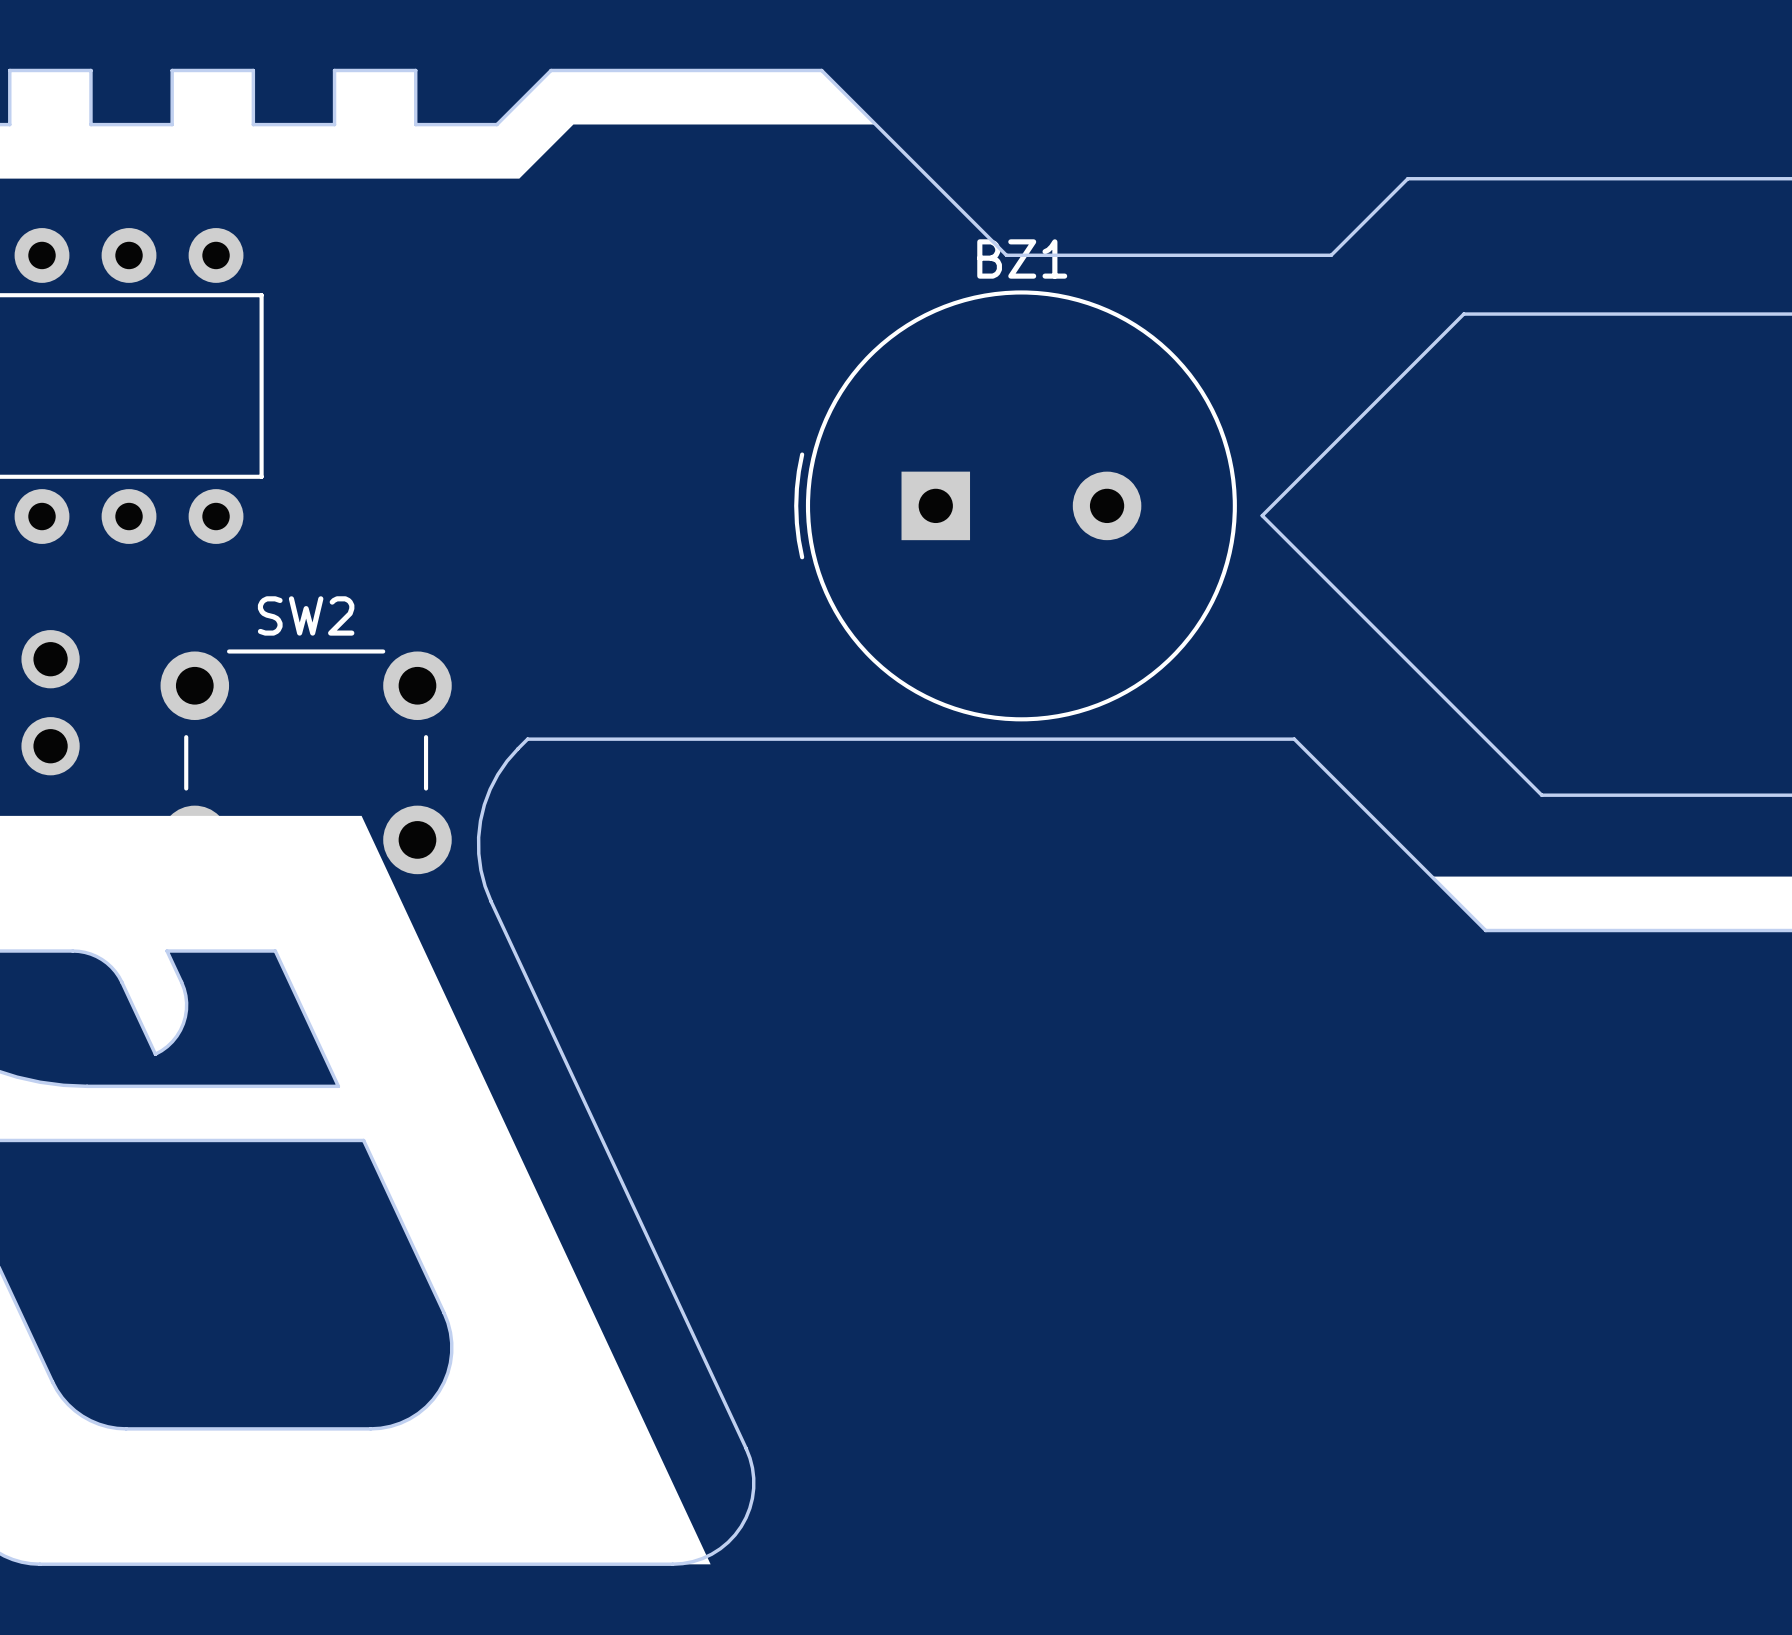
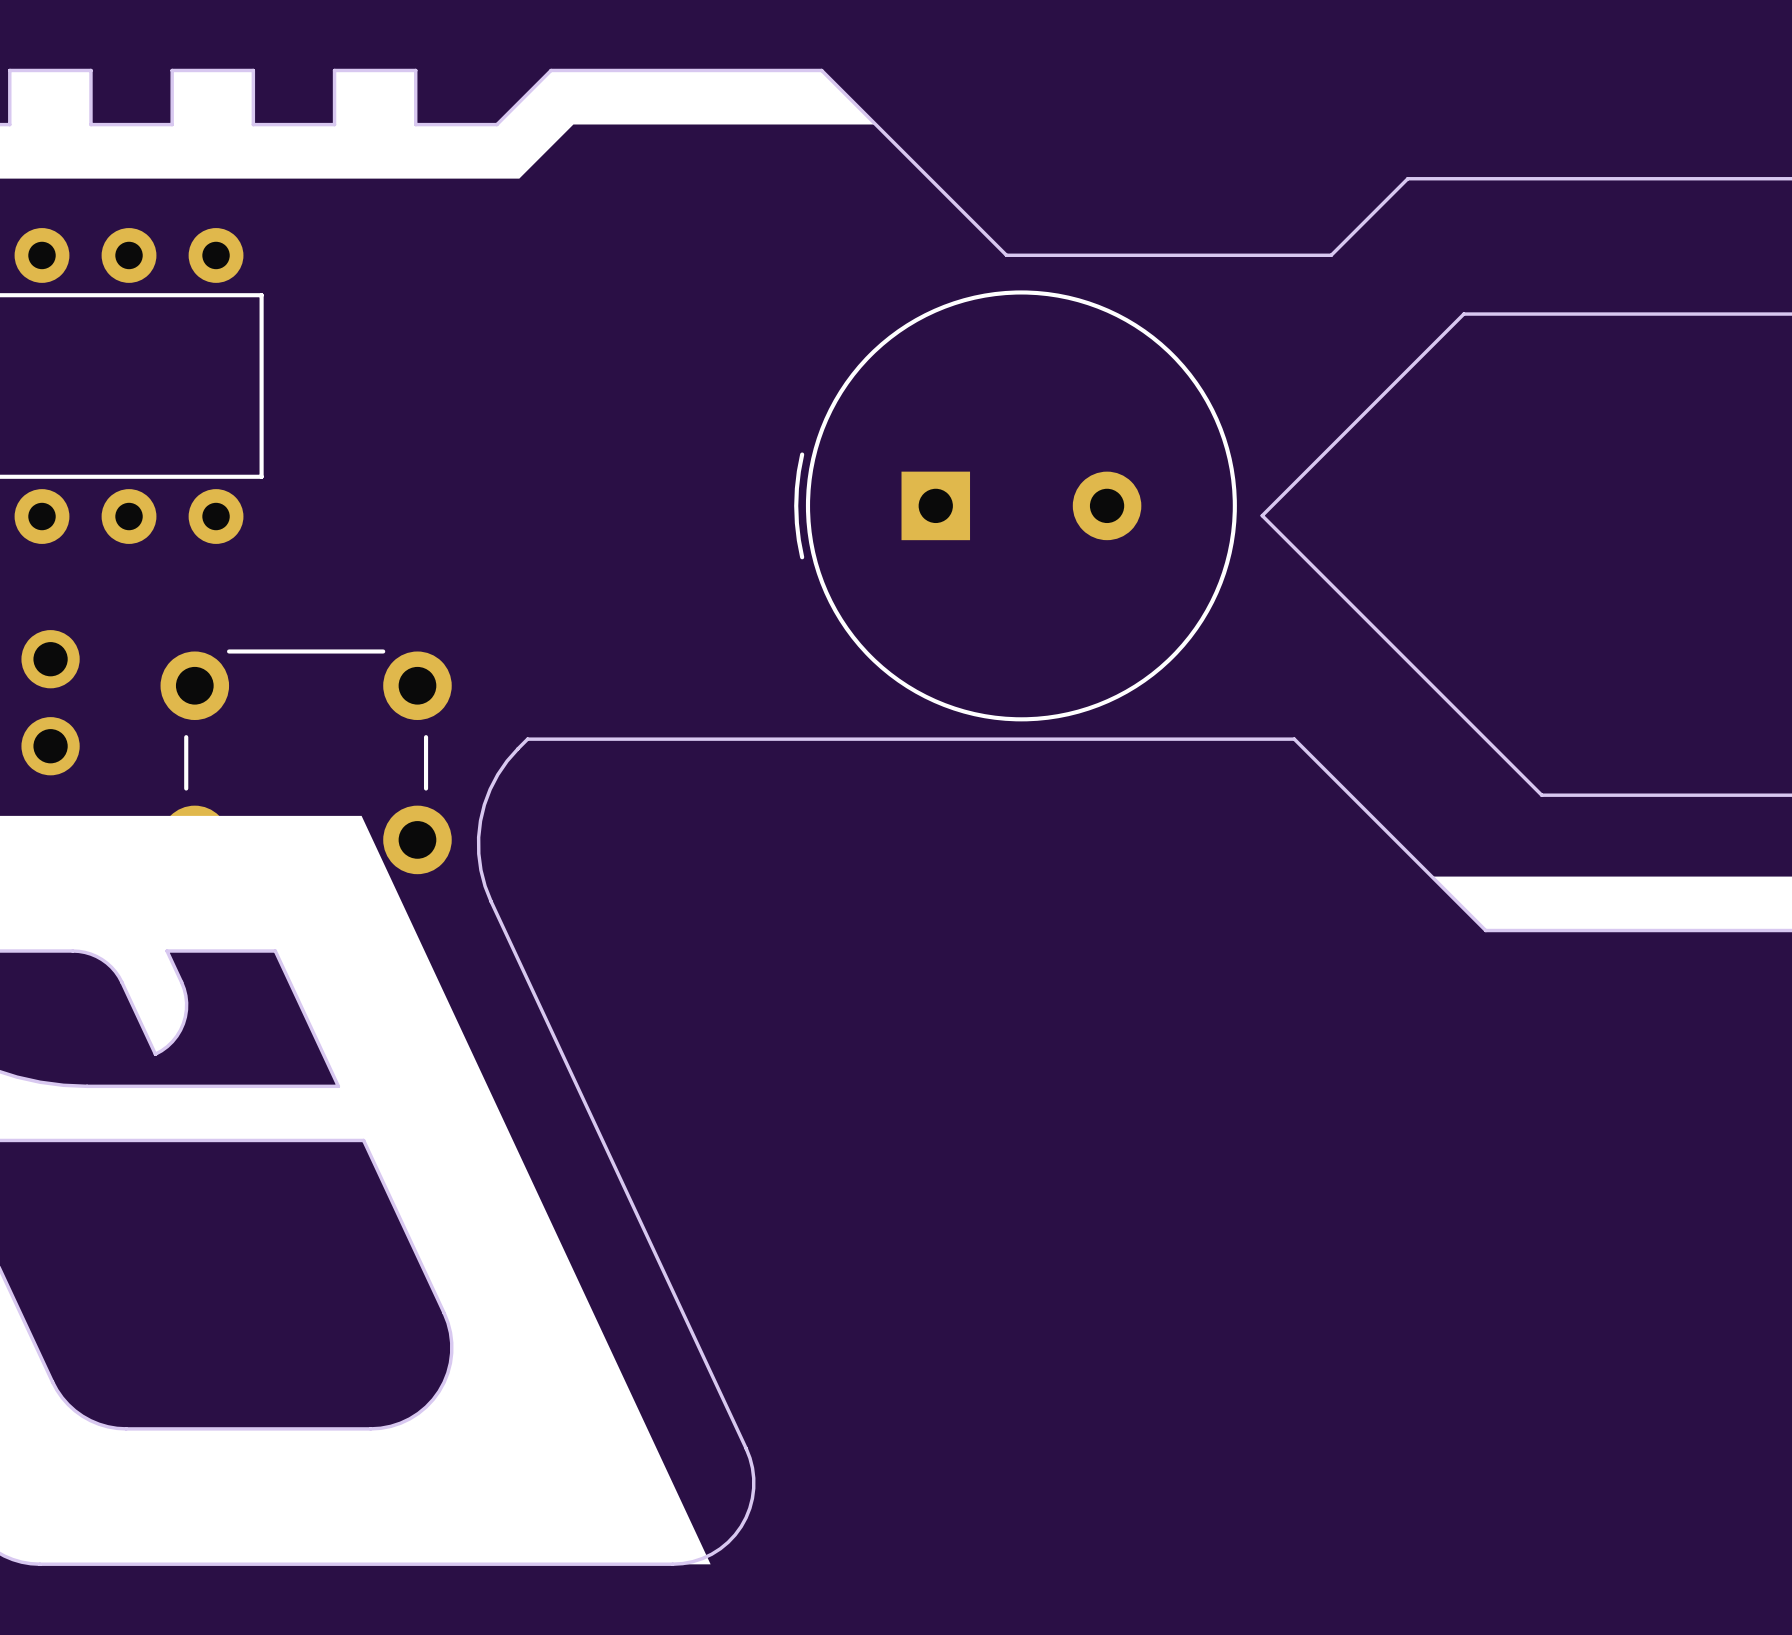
BZ1 name: BZ1 (1022, 258) -> none
SW2 name: SW2 (306, 615) -> none

